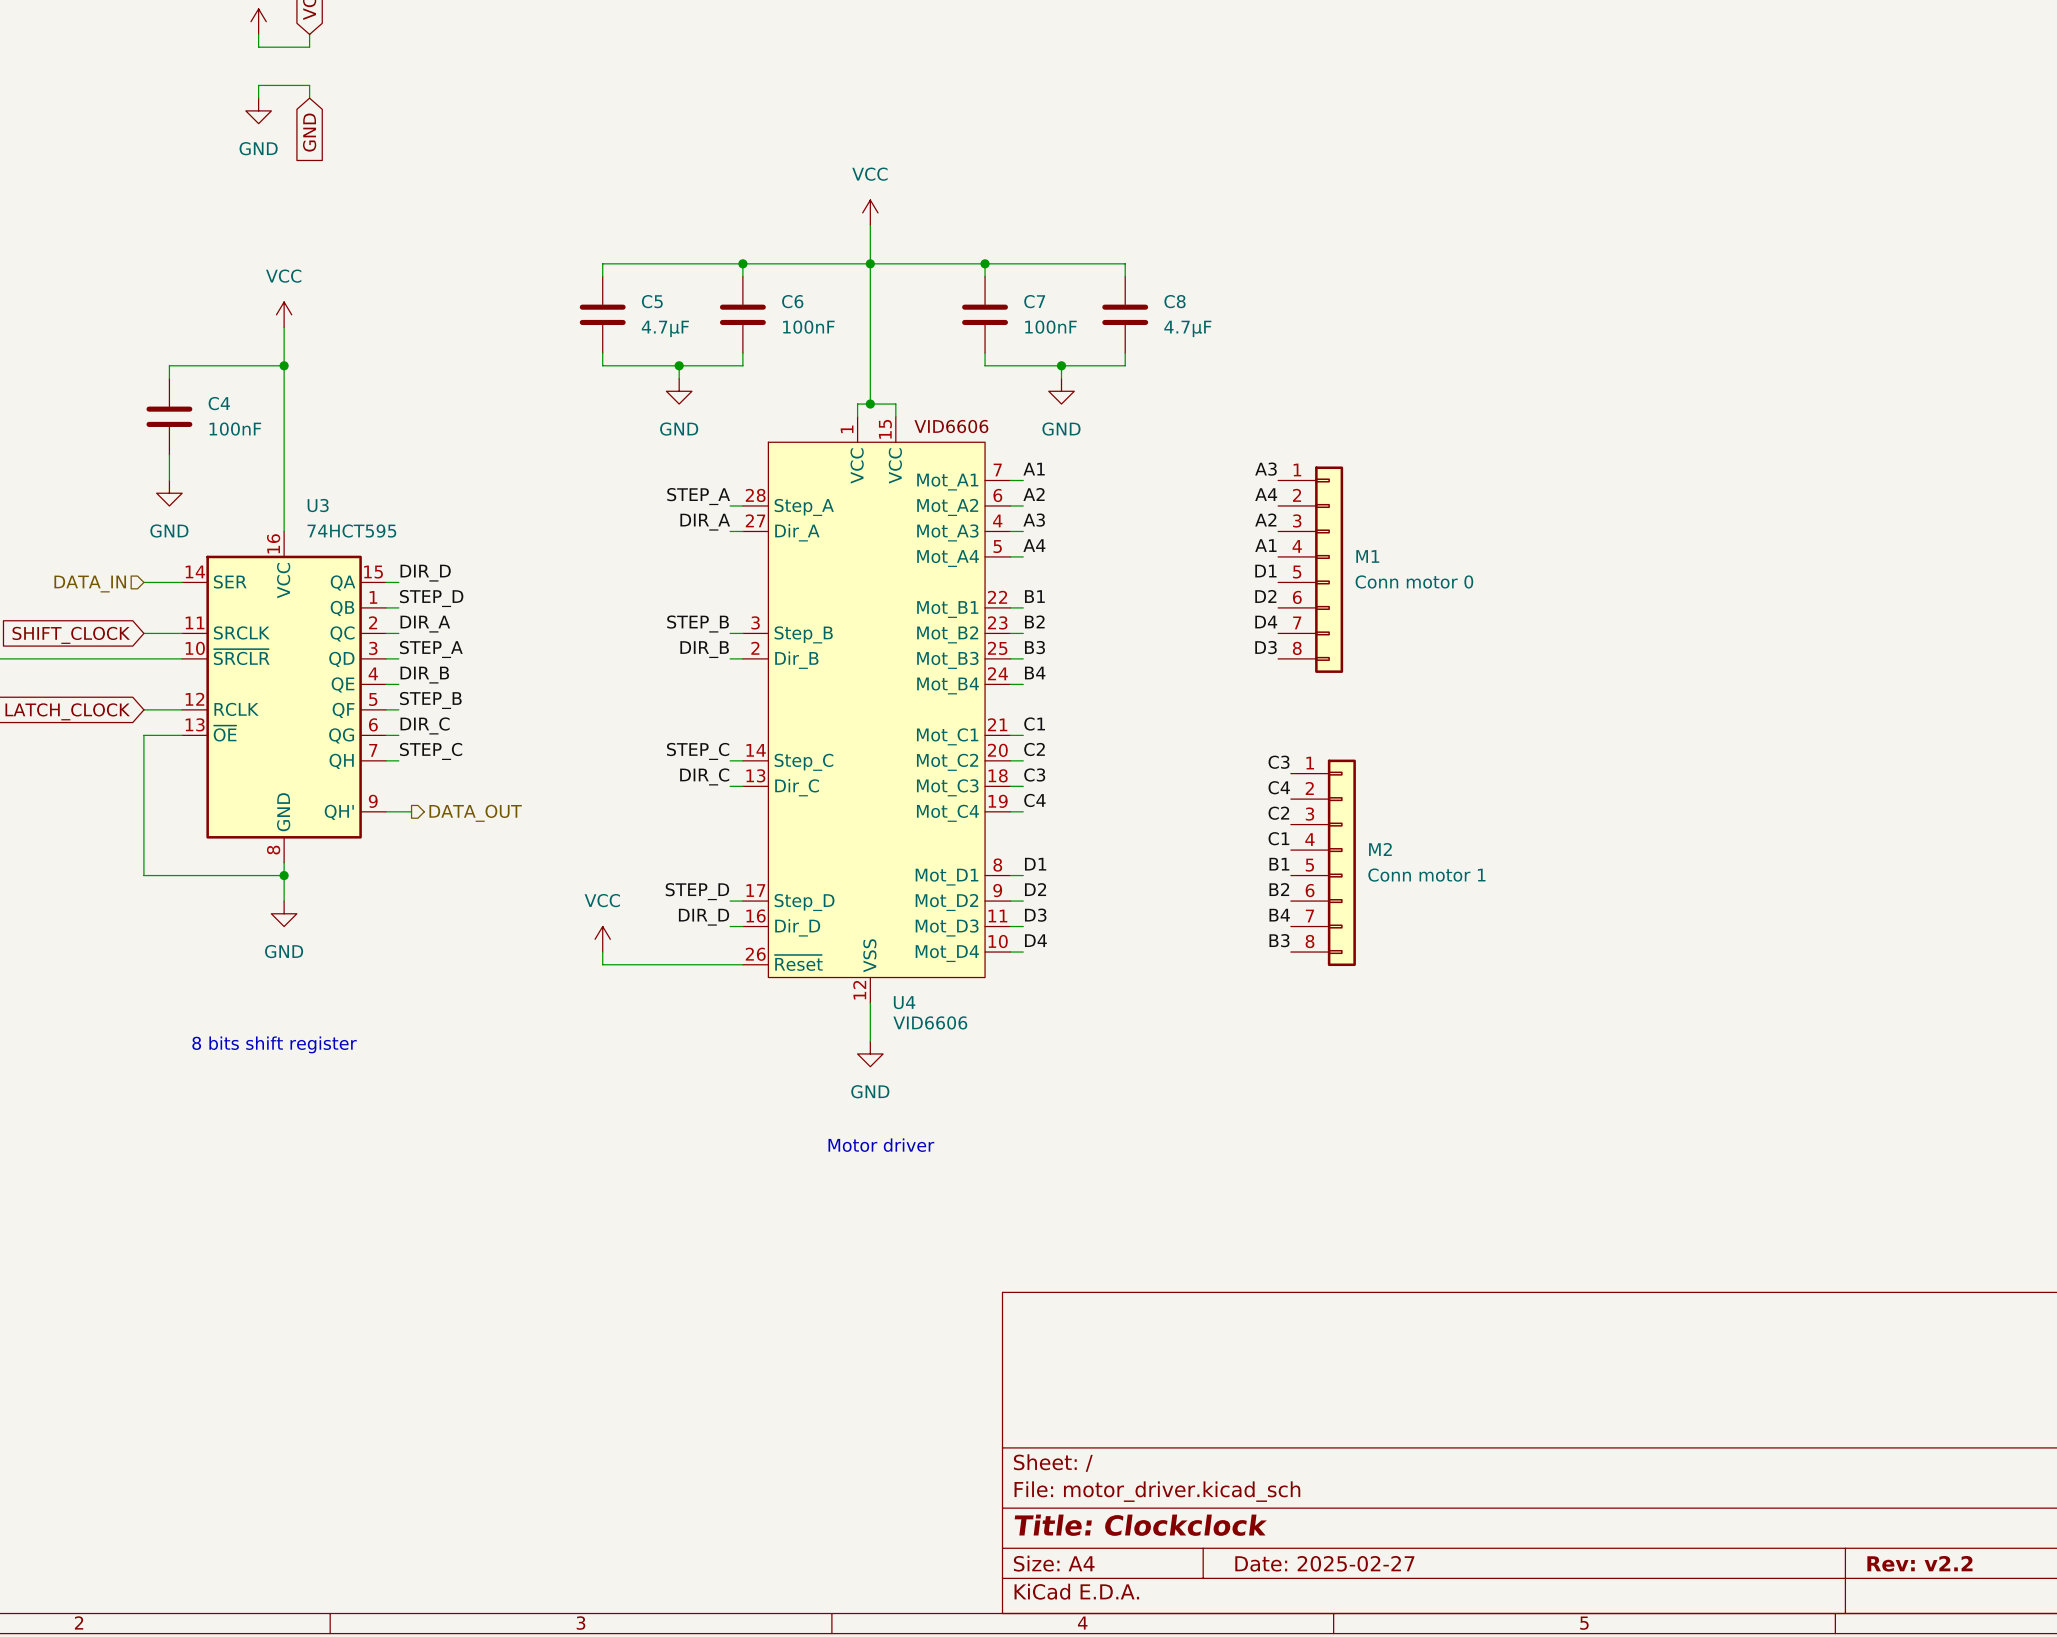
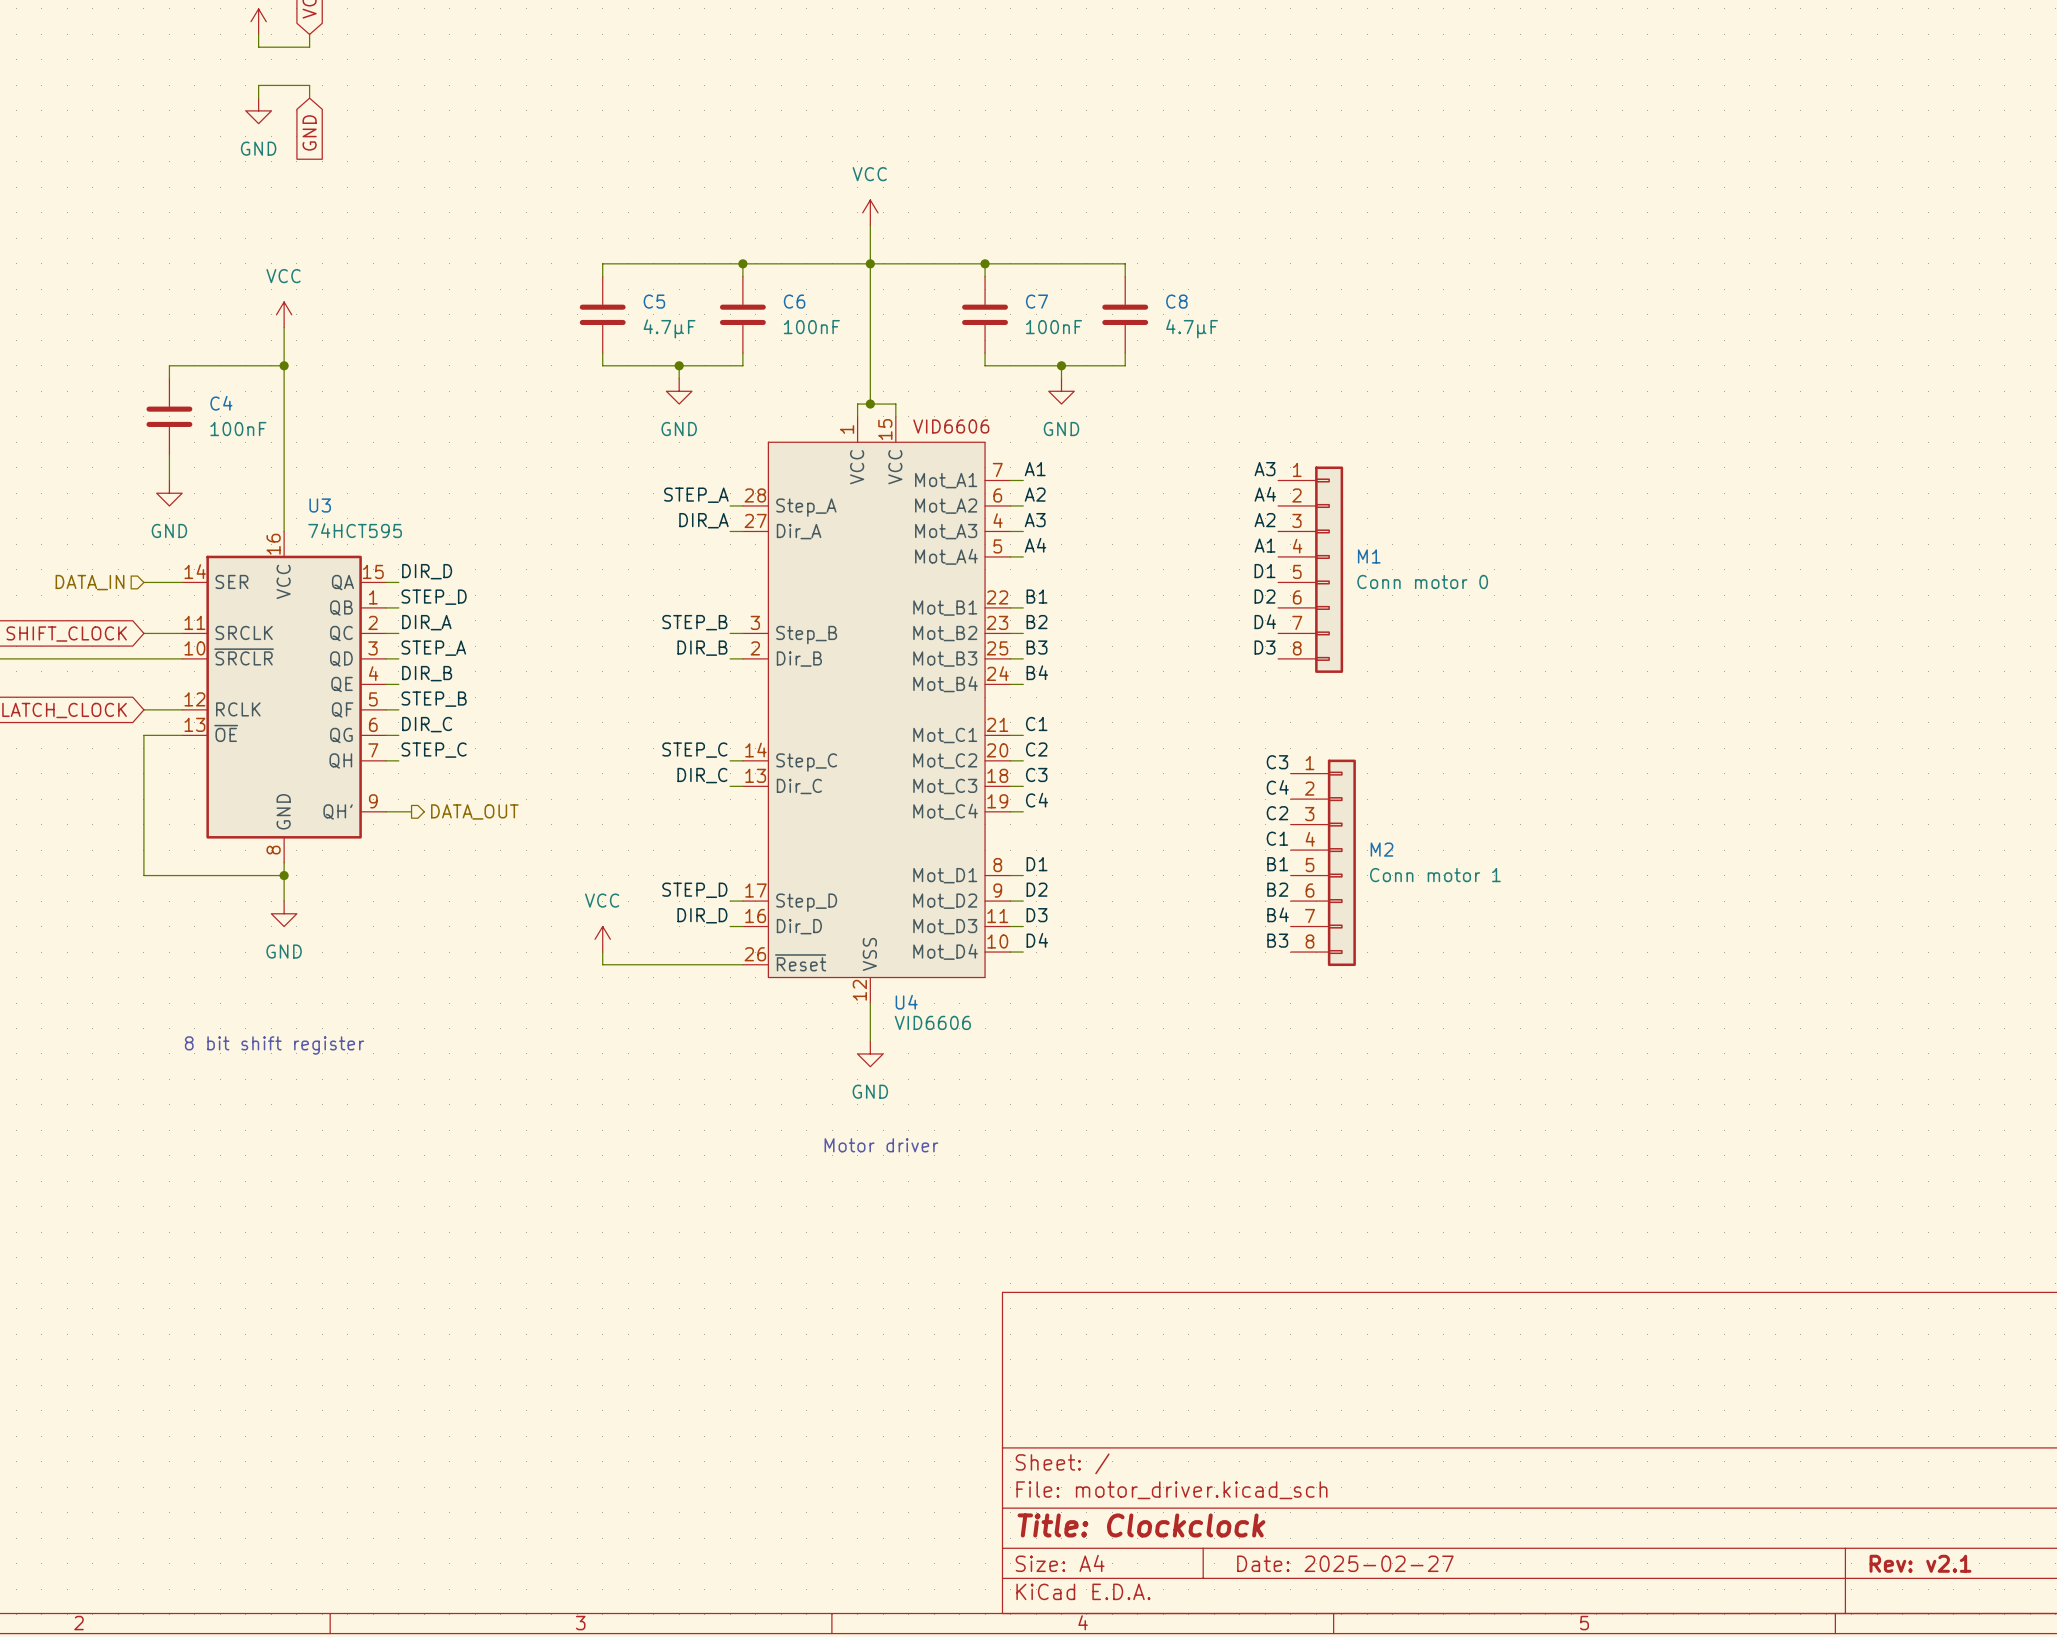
text: 8 bits shift register (274, 1044) -> 8 bit shift register (274, 1045)
title block: Rev: v2.2 (1919, 1563) -> Rev: v2.1 (1920, 1563)

